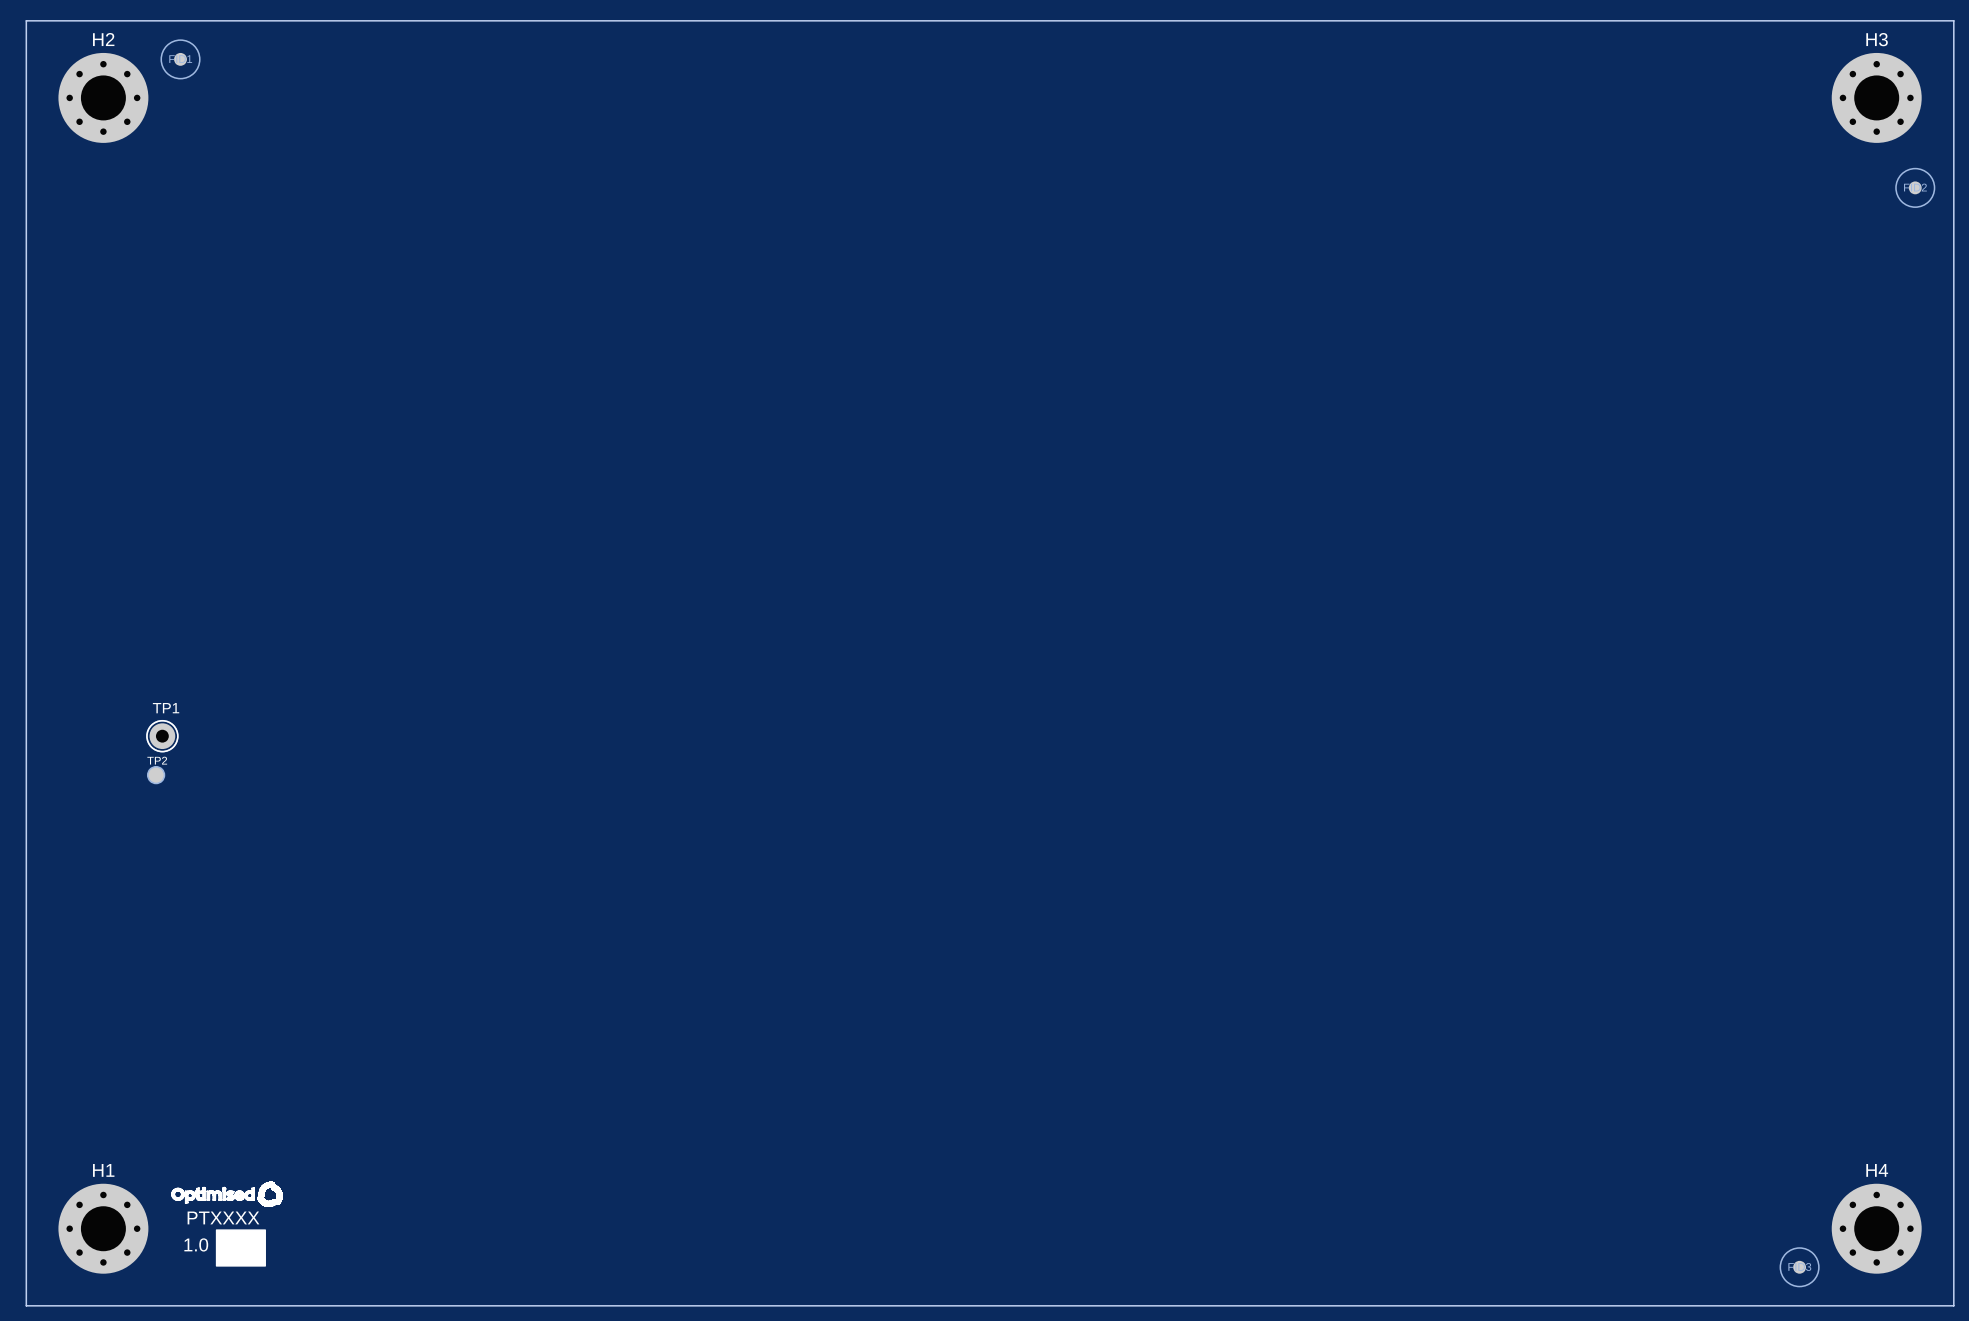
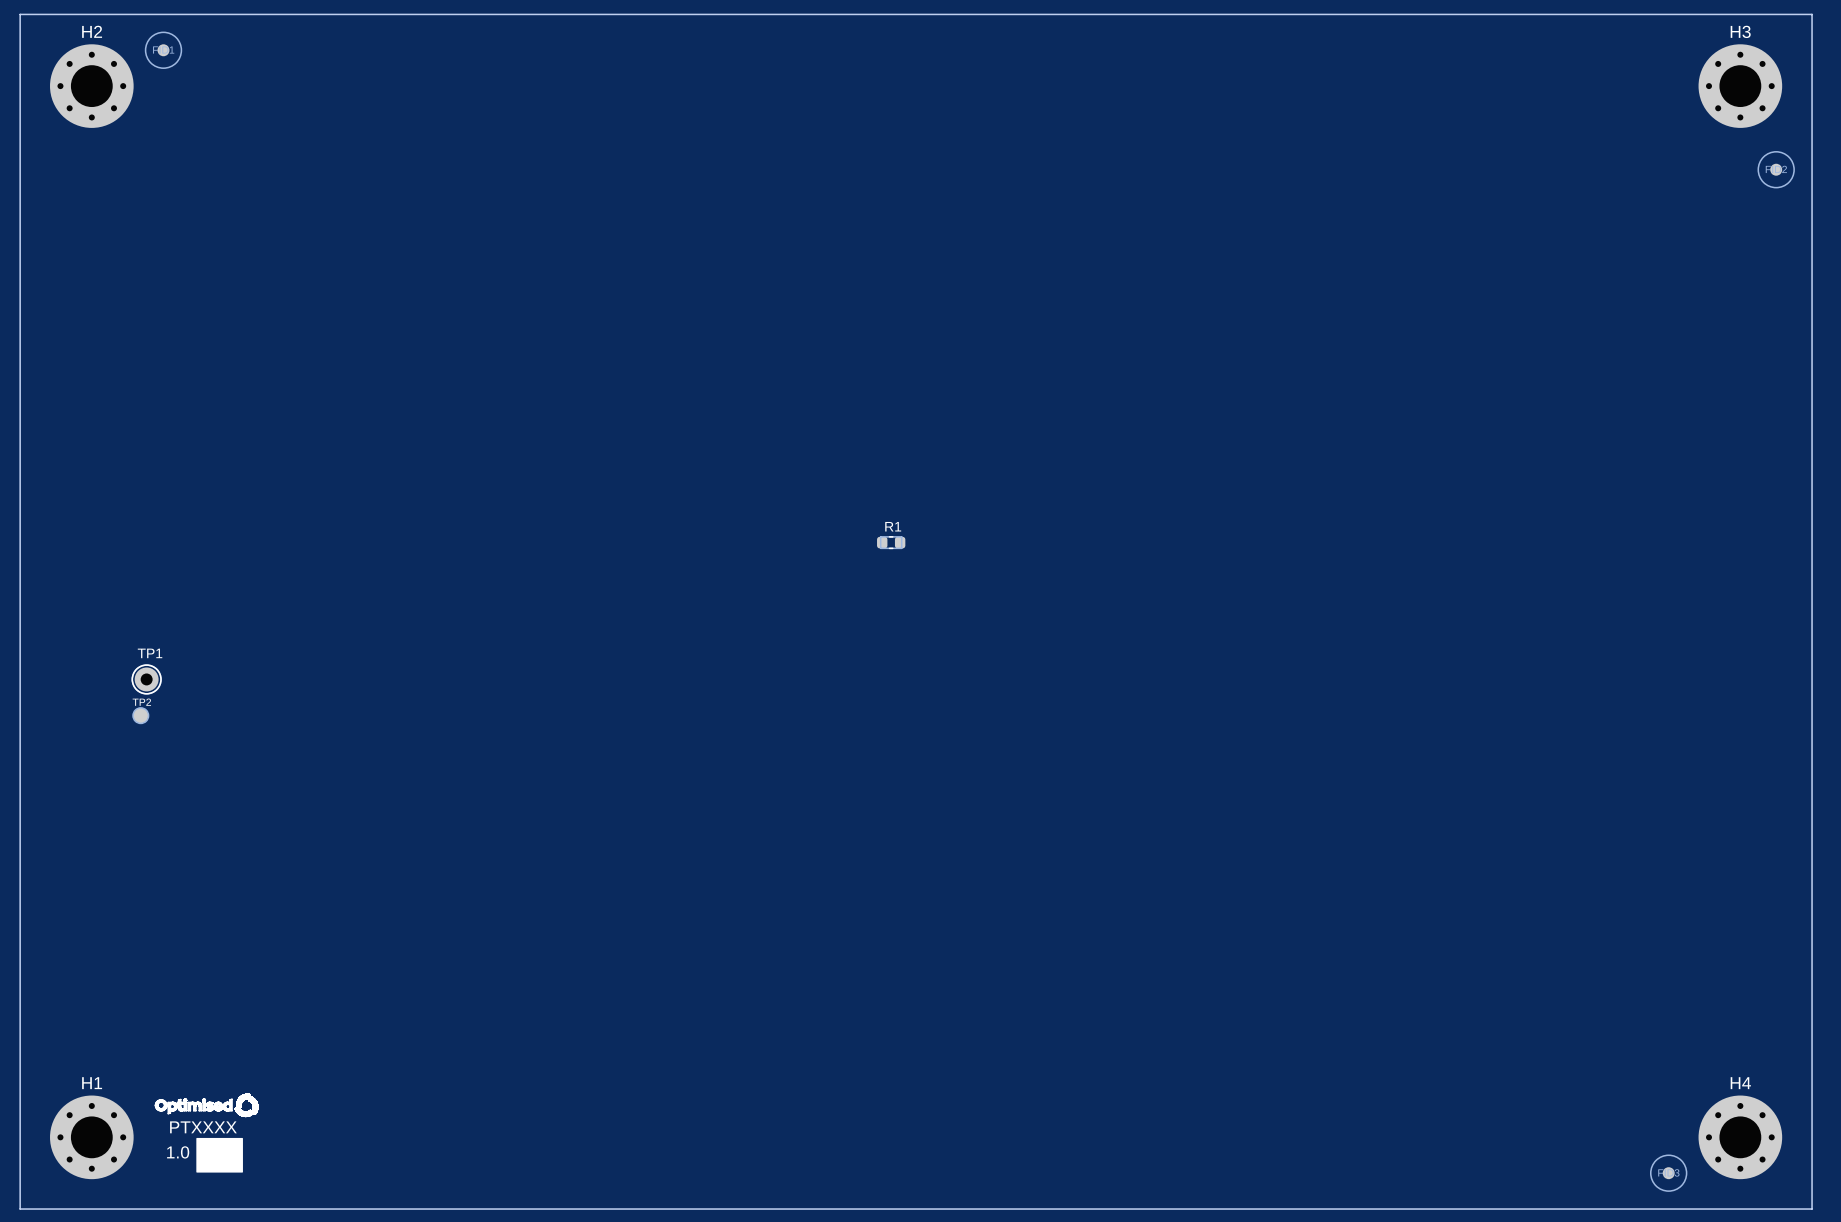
R1: none -> (891, 542)

